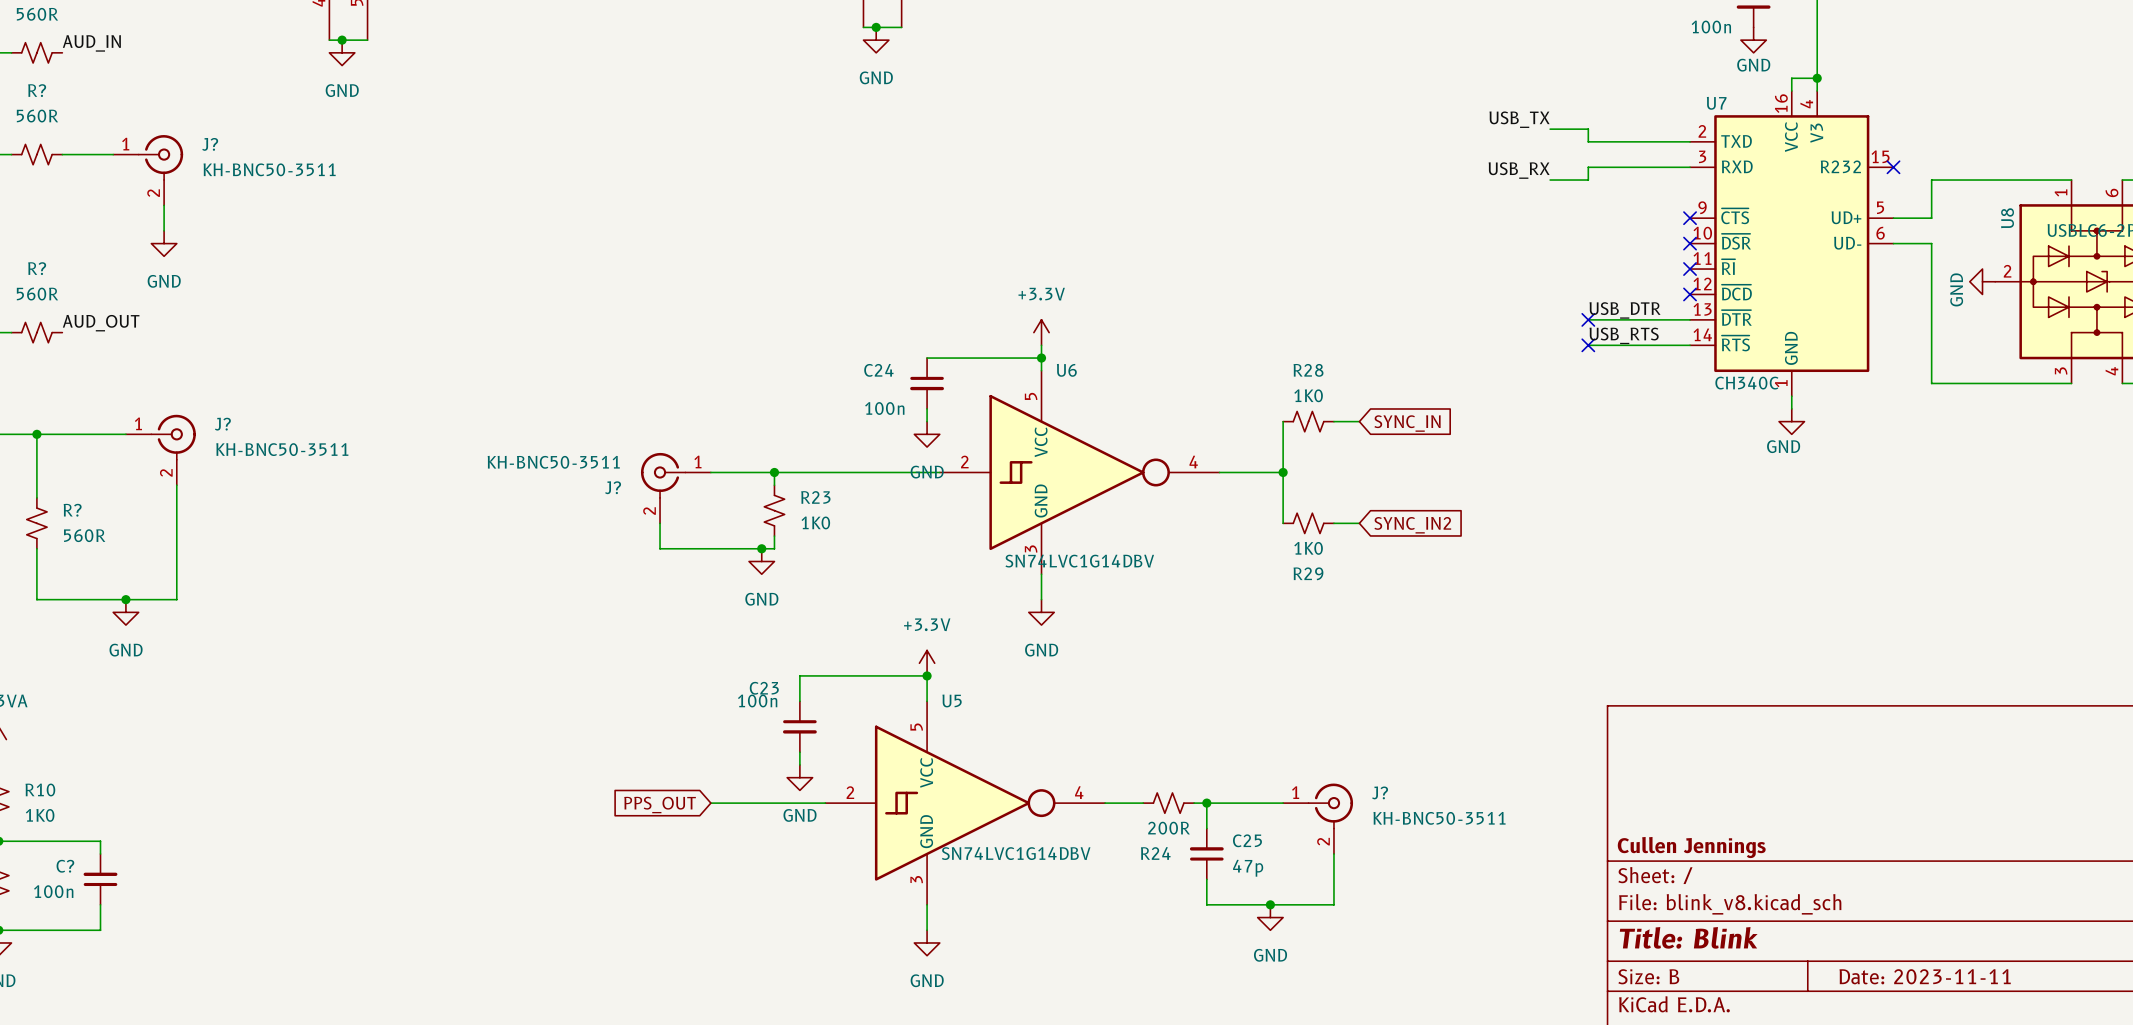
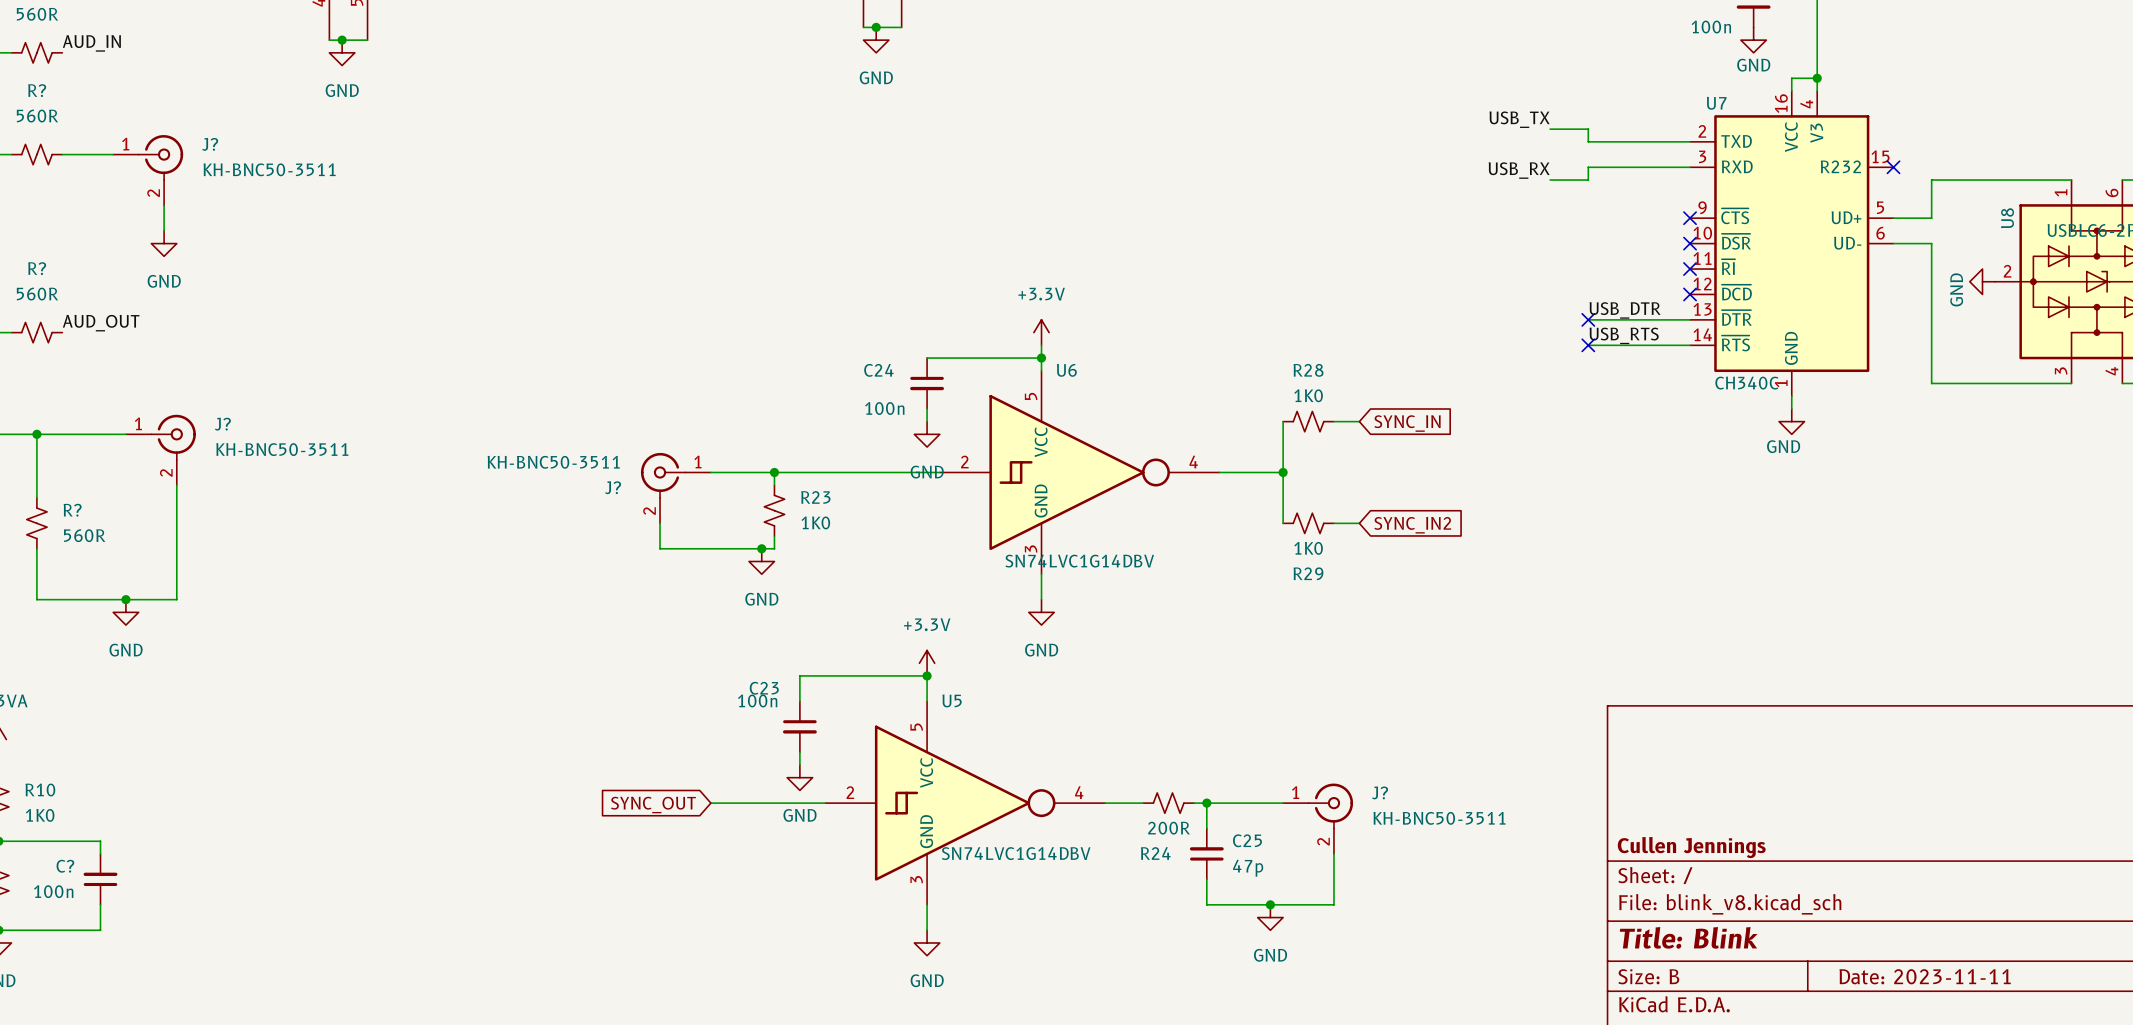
global label: PPS_OUT (660, 805) -> SYNC_OUT (653, 805)

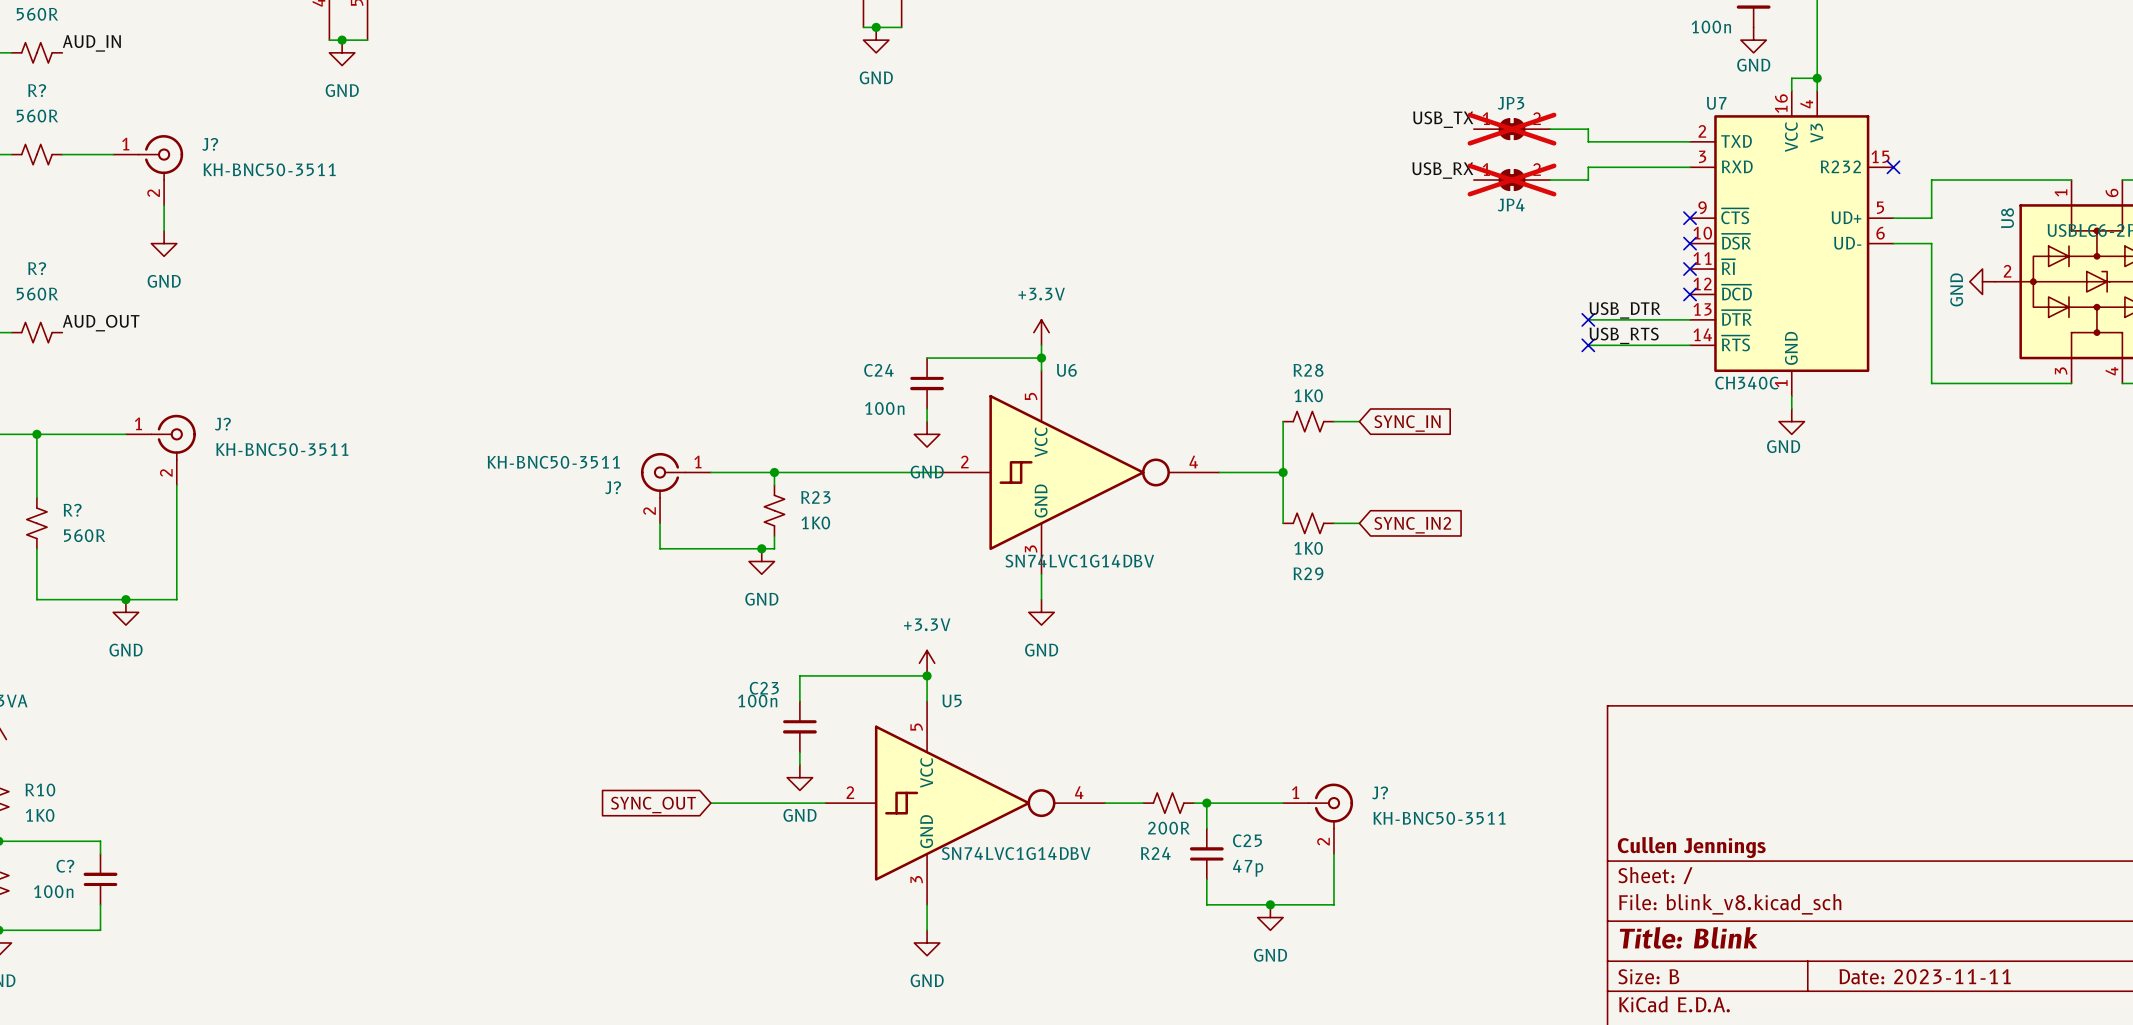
label position: USB_TX (1519, 119) -> USB_TX (1443, 119)
JP3: none -> (1512, 129)
label position: USB_RX (1519, 170) -> USB_RX (1442, 170)
JP4: none -> (1512, 180)

